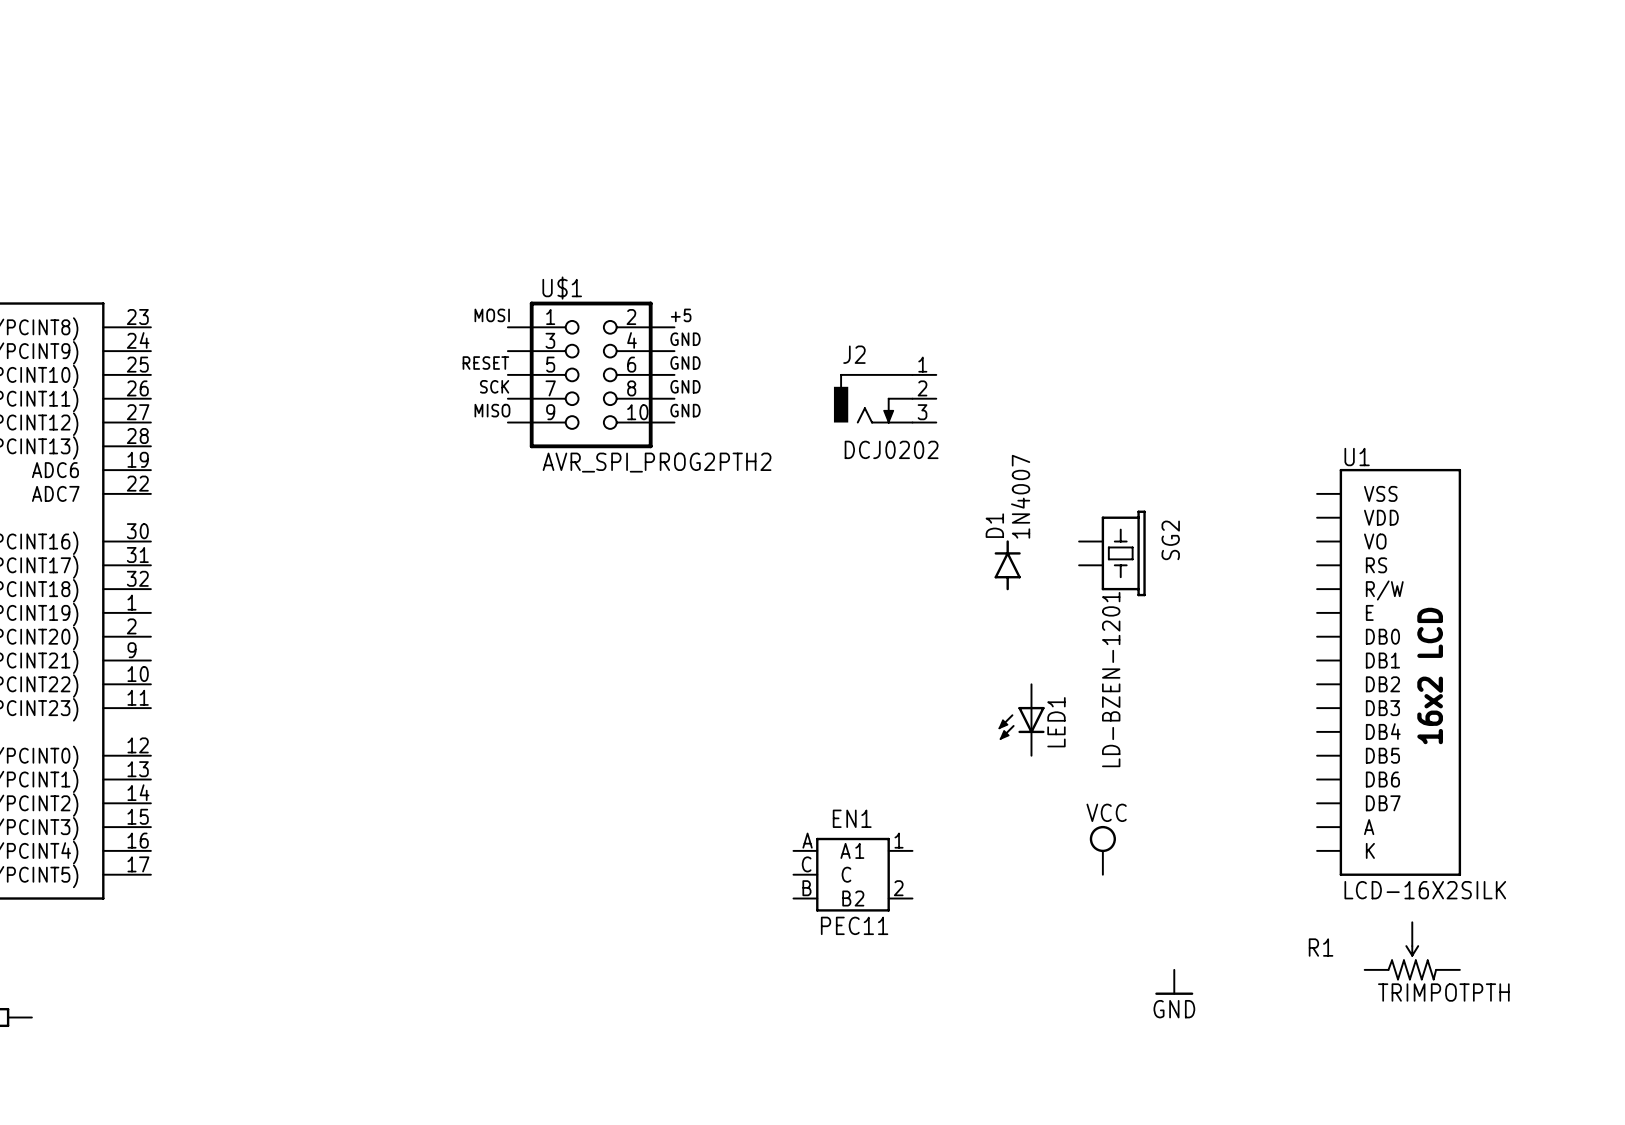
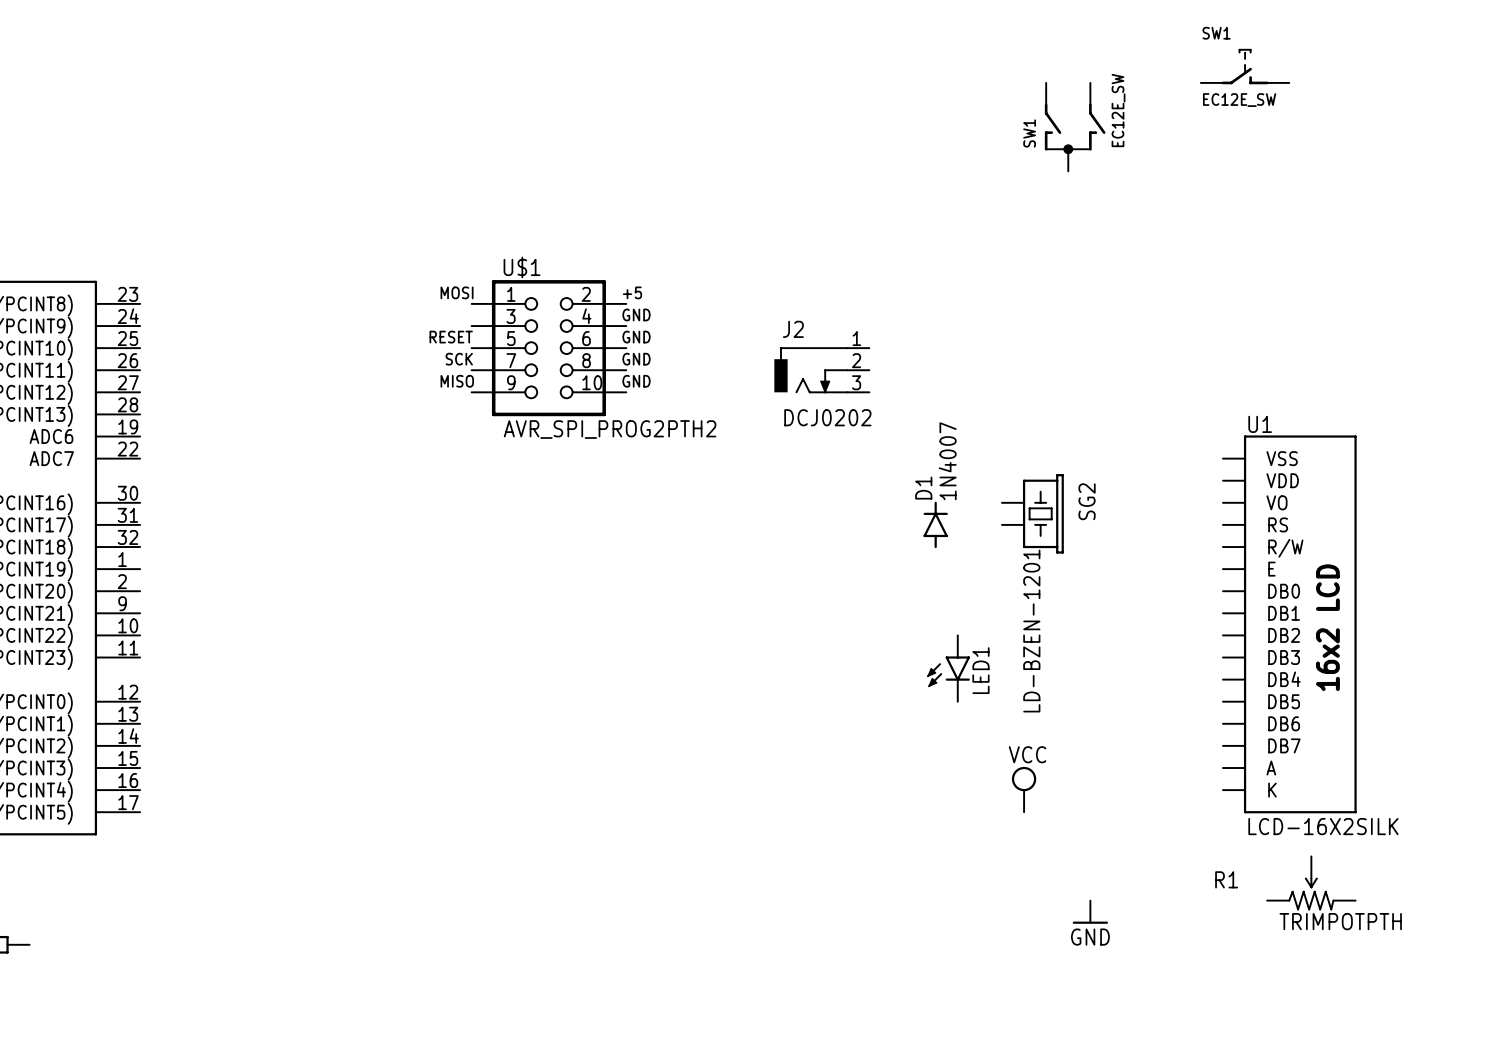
SW1: none -> EC12E_SW (1245, 66)
SW1: none -> EC12E_SW (1075, 127)
LED1 symbol: [998, 684, 1045, 756] -> [927, 635, 970, 702]
EN1: PEC11 (852, 874) -> none

